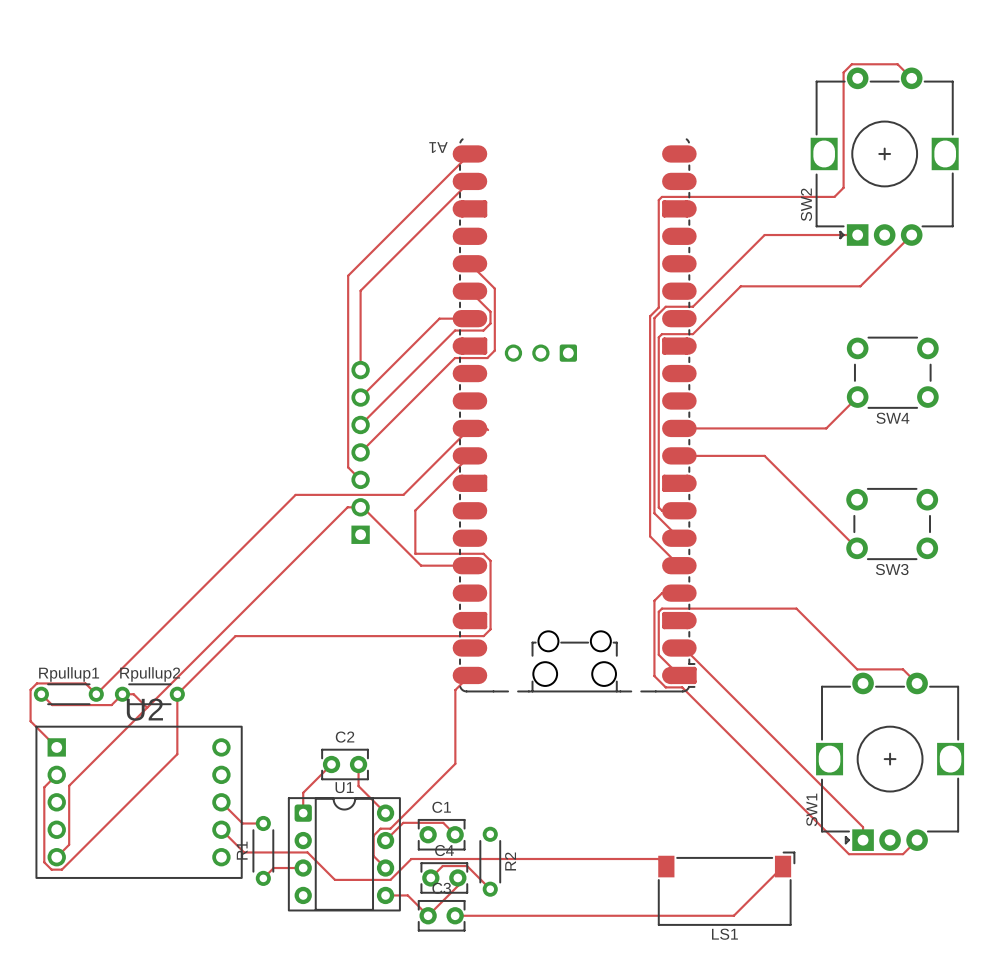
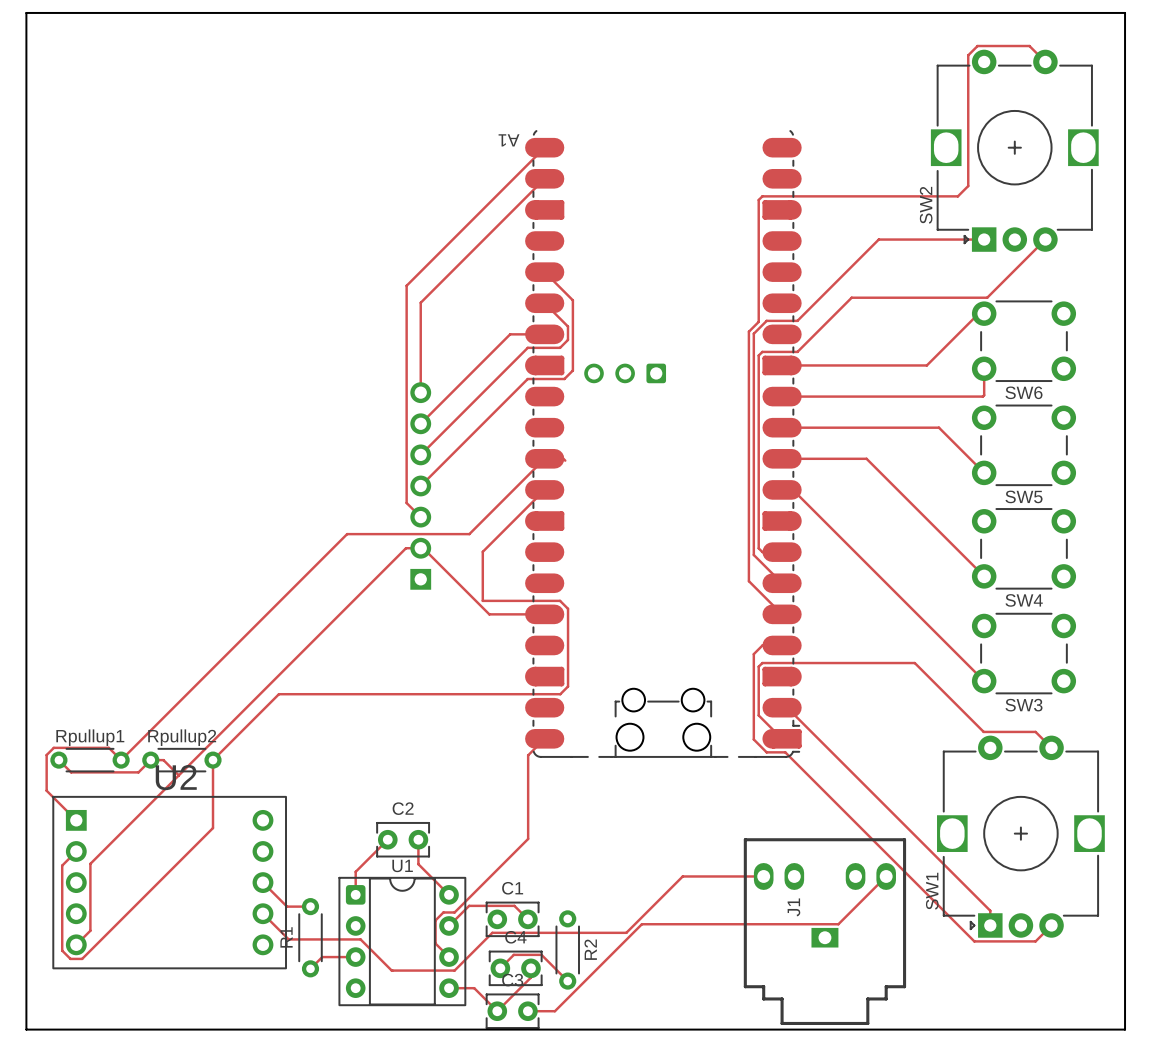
board edge: none -> (26, 12) (1125, 12) (1125, 1029) (26, 1029) (26, 12)
track: none -> (984, 313) (978, 313) (926, 365) (782, 365)
SW6: none -> (1023, 341)
track: none -> (984, 368) (982, 396) (782, 396)
SW4 position: (892, 372) -> (1023, 548)
track: (857, 397) (826, 428) (753, 428) -> (984, 576) (866, 458)
track: none -> (782, 427) (938, 427) (984, 472)
SW5: none -> (1023, 445)
track: (688, 455) (764, 455) (857, 548) -> (792, 489) (984, 681)
SW3 position: (892, 524) -> (1023, 653)
J1: none -> (824, 931)
track: (411, 858) (658, 858) (666, 866) -> (478, 946) (492, 932) (626, 932) (682, 876) (763, 876)
track: (783, 866) (733, 915) (478, 915) -> (886, 876) (838, 924) (641, 924) (554, 1011)
LS1: (726, 888) -> none

